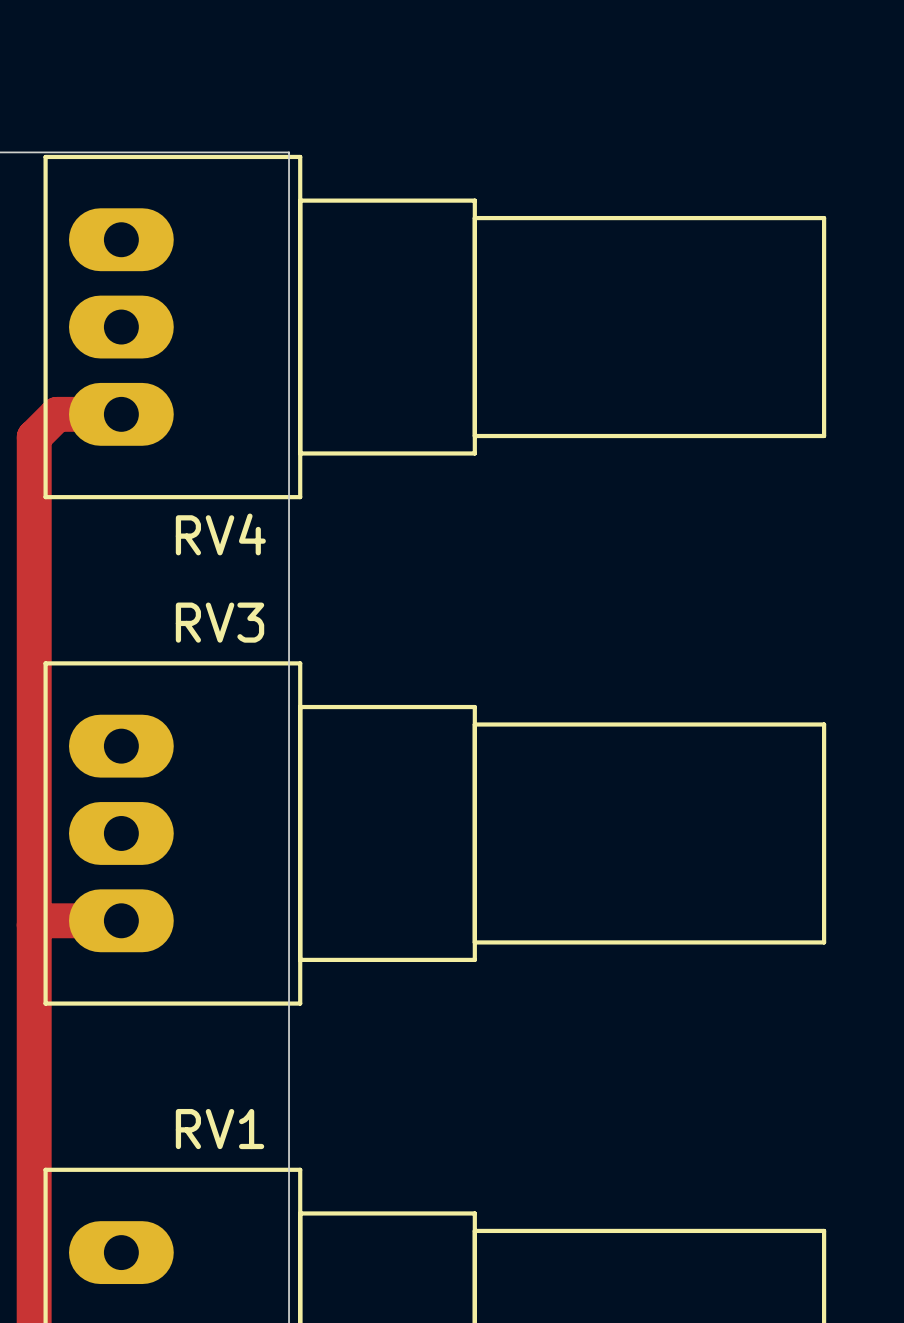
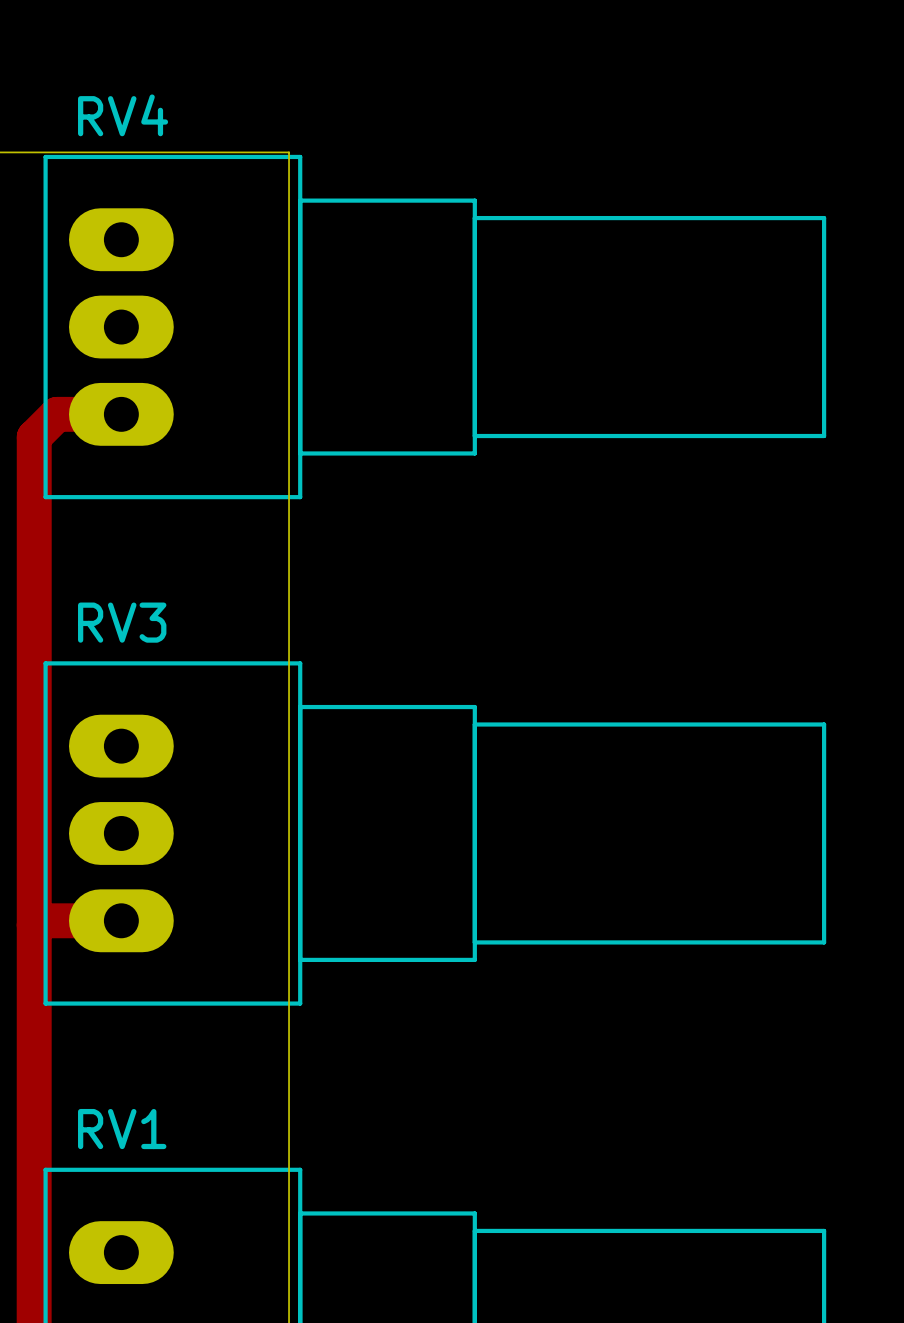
RV4 name position: RV4 (220, 534) -> RV4 (123, 115)
RV3 name position: RV3 (220, 622) -> RV3 (122, 622)
RV1 name position: RV1 (220, 1129) -> RV1 (122, 1129)

